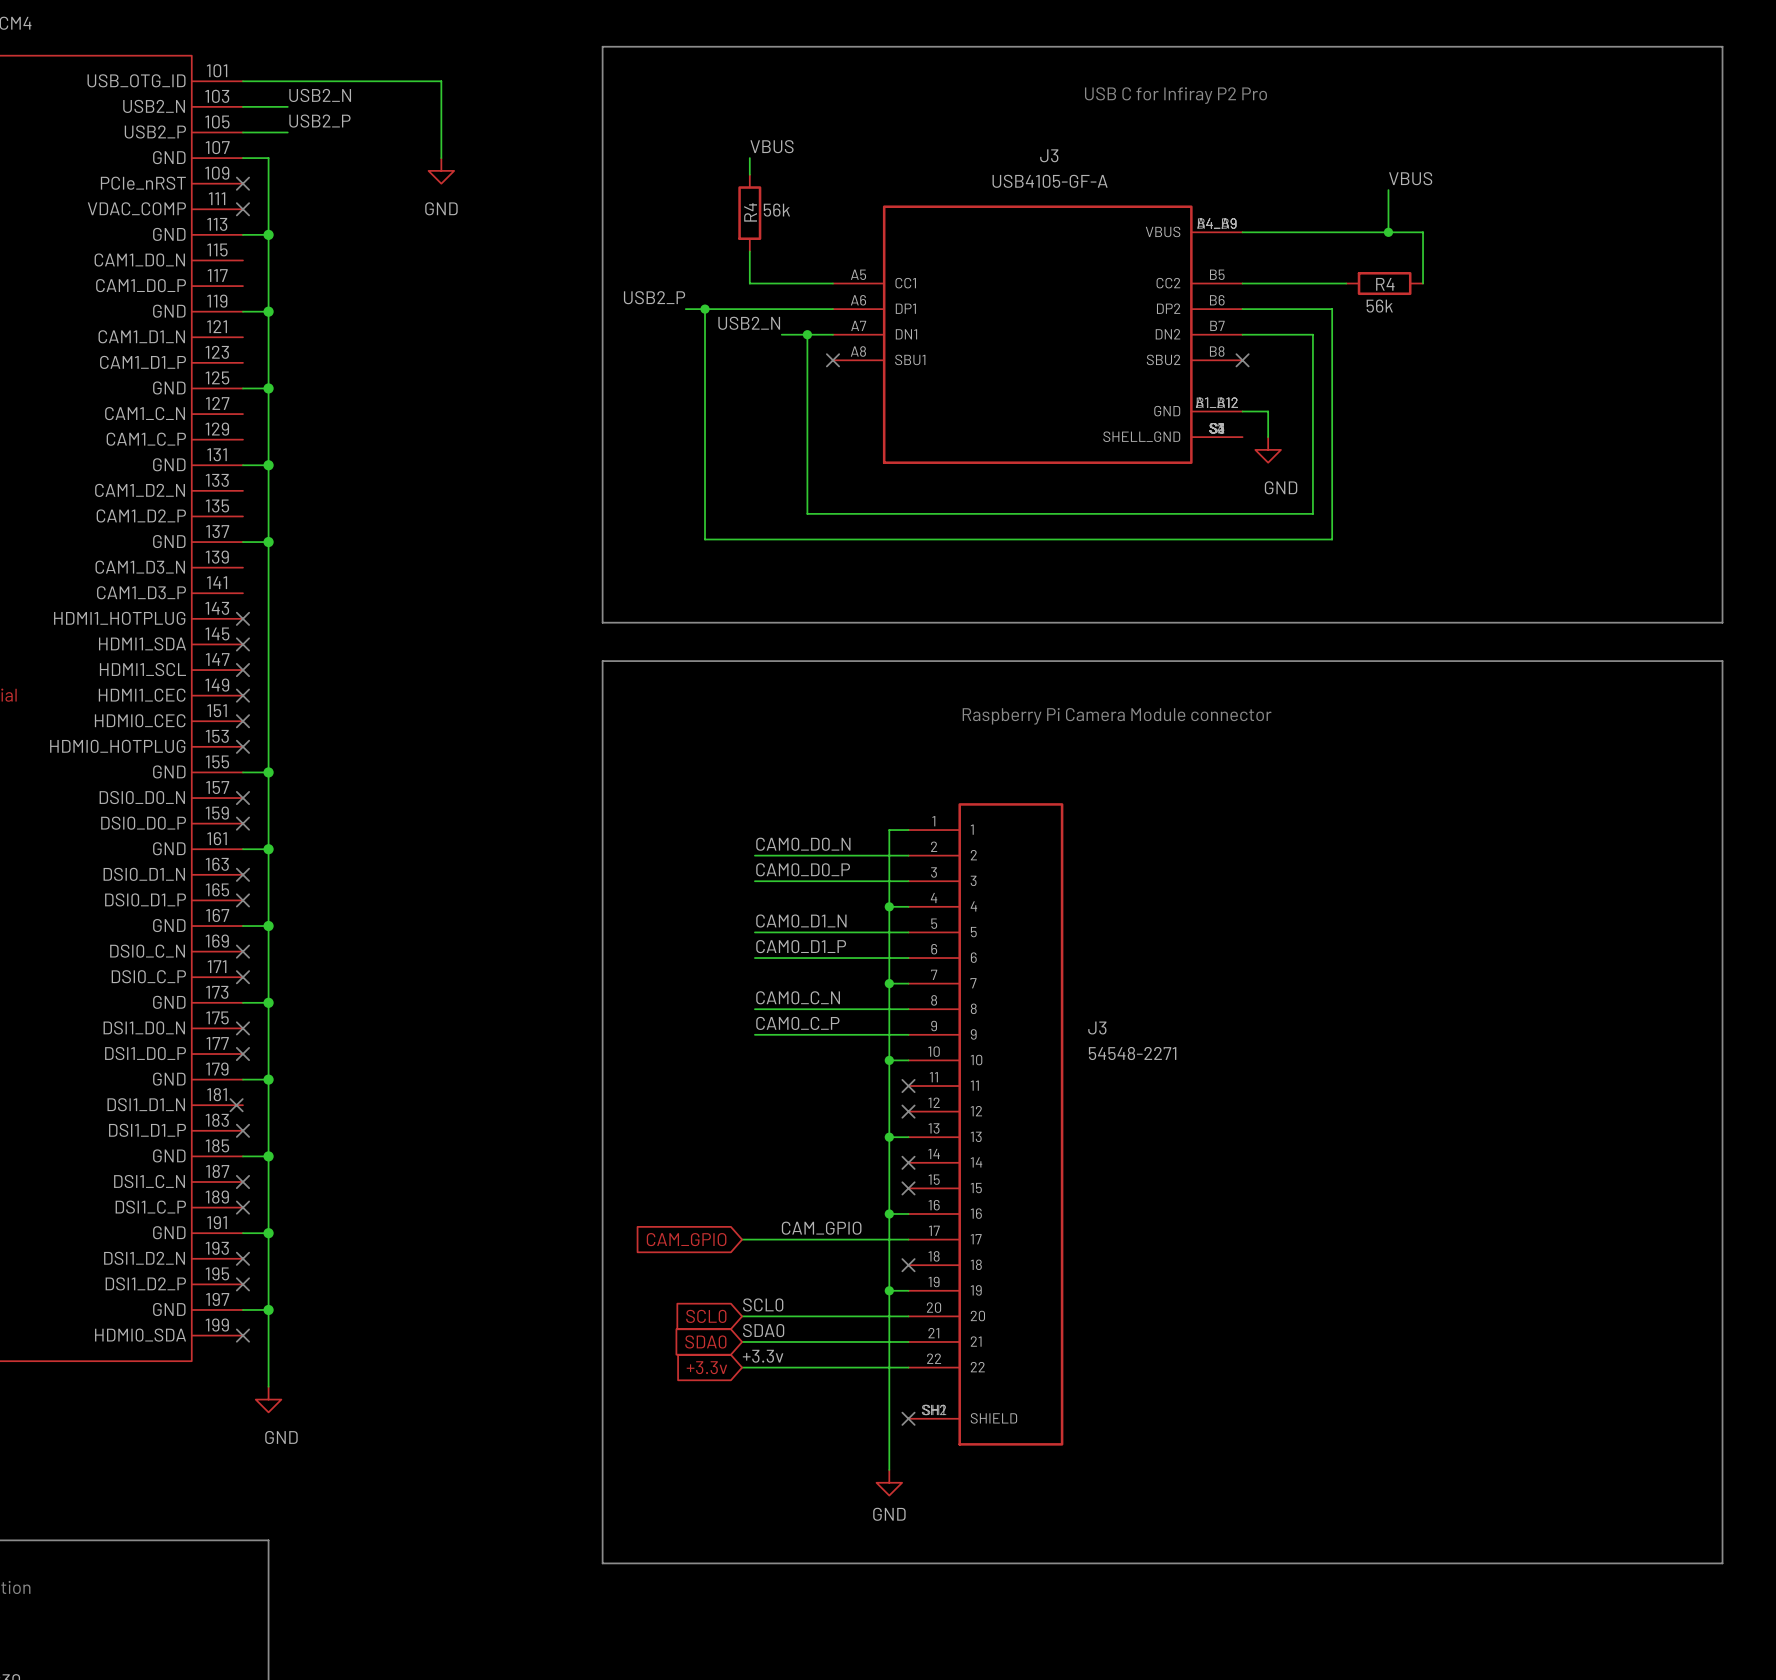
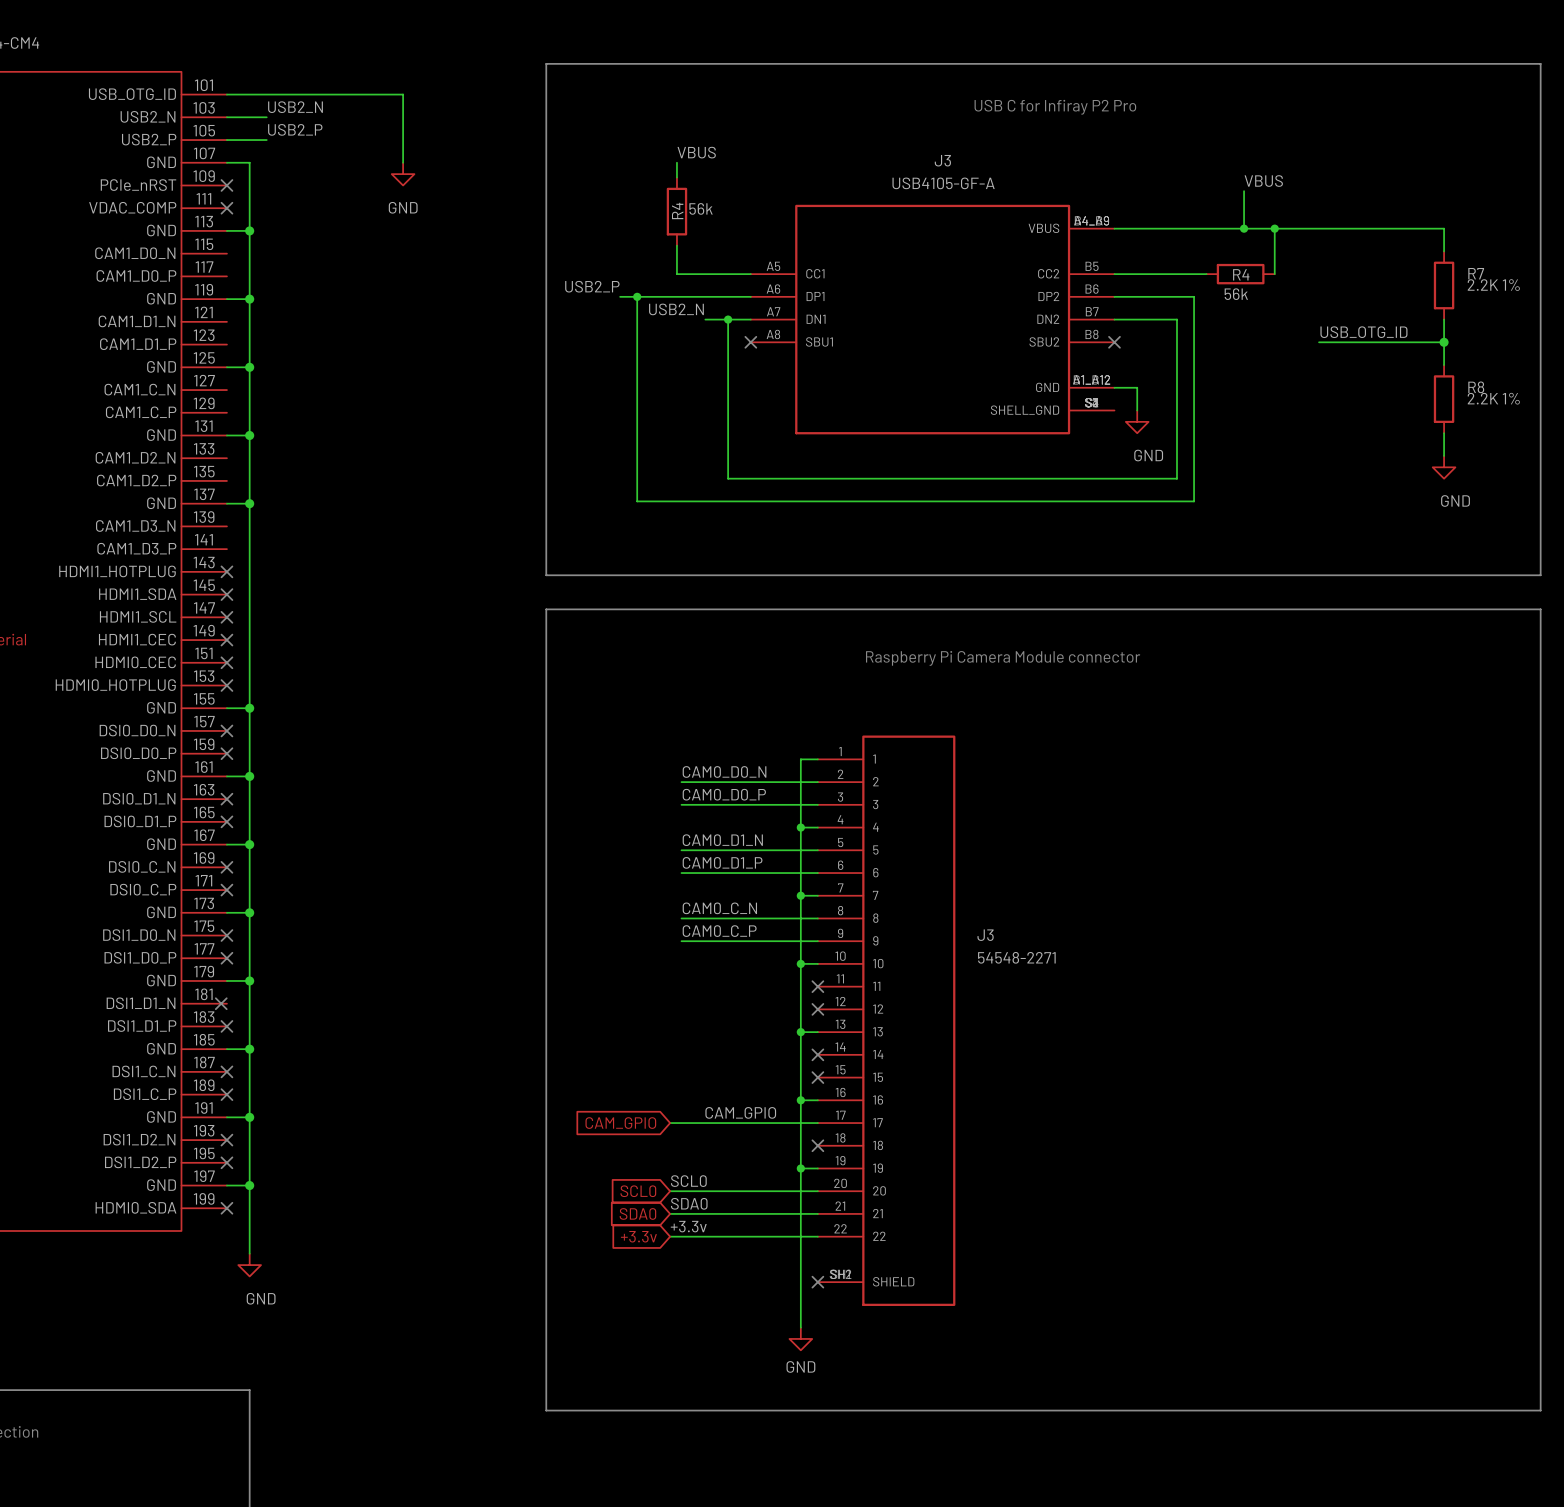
wire: none -> (1274, 228) (1444, 228) (1444, 251)
junction: none -> (1274, 228)
R7: none -> 2.2K 1% (1444, 285)
wire: none -> (1444, 319) (1444, 365)
label: none -> USB_OTG_ID (1363, 332)
wire: none -> (1319, 342) (1444, 342)
junction: none -> (1444, 342)
R8: none -> 2.2K 1% (1444, 399)
wire: none -> (1444, 433) (1444, 455)
power symbol: none -> GND (1444, 467)

